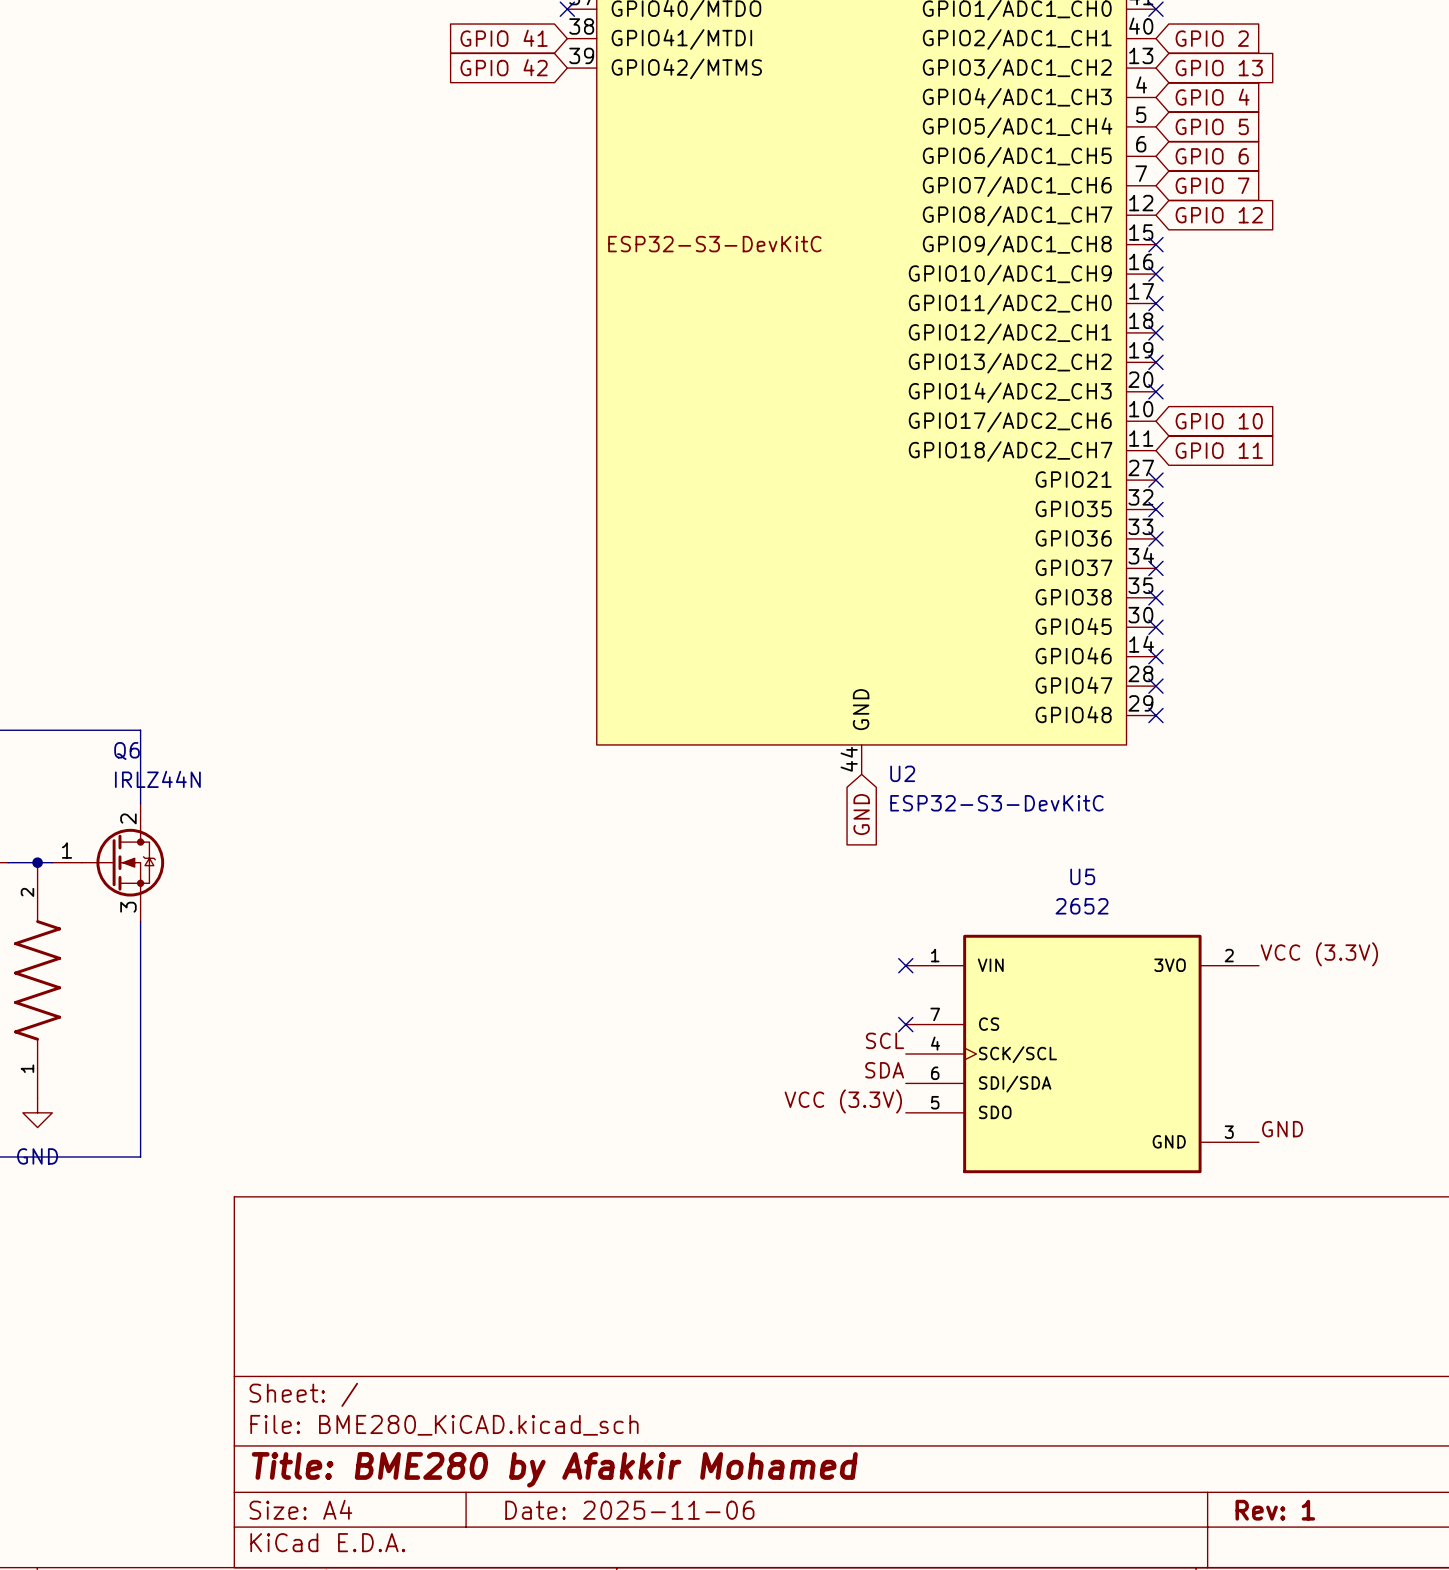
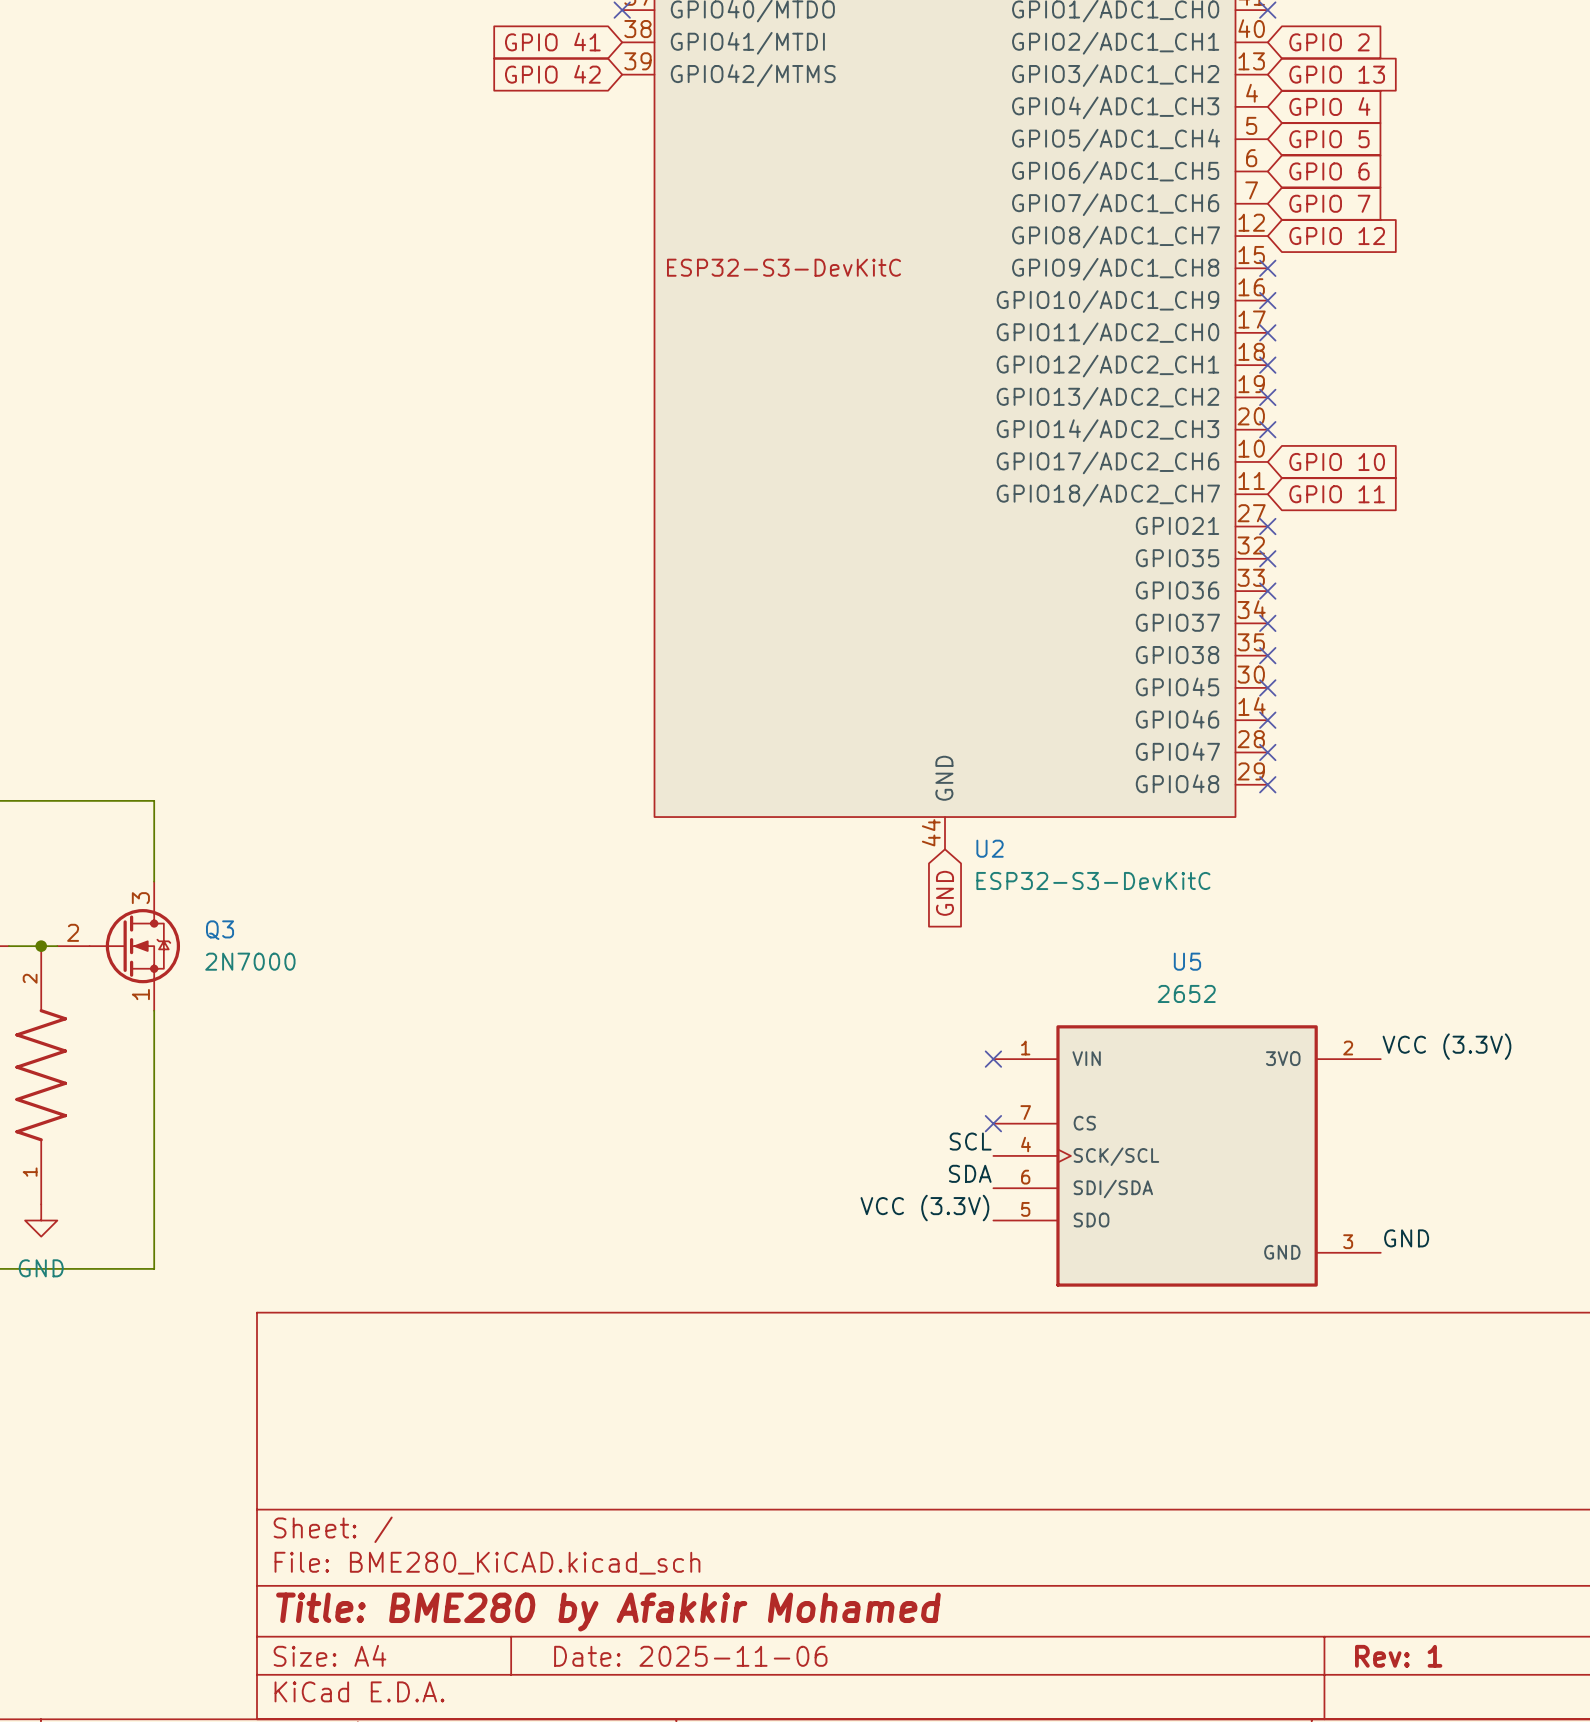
Q6 name: Q6 (127, 751) -> Q3 (220, 930)
Q6 value: IRLZ44N (157, 779) -> 2N7000 (250, 961)
Q6 pin number: 2 (128, 818) -> 3 (140, 898)
Q6 pin number: 1 (67, 850) -> 2 (73, 932)
Q6 pin number: 3 (128, 907) -> 1 (140, 994)

